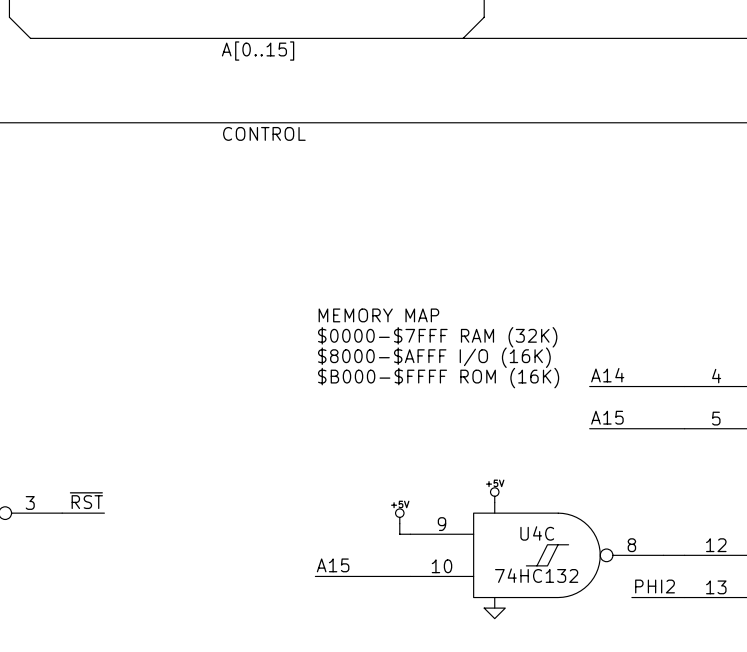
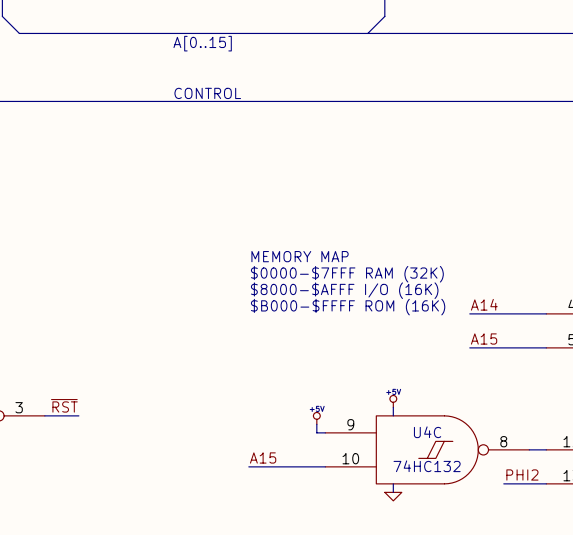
text position: CONTROL (264, 133) -> CONTROL (207, 93)

